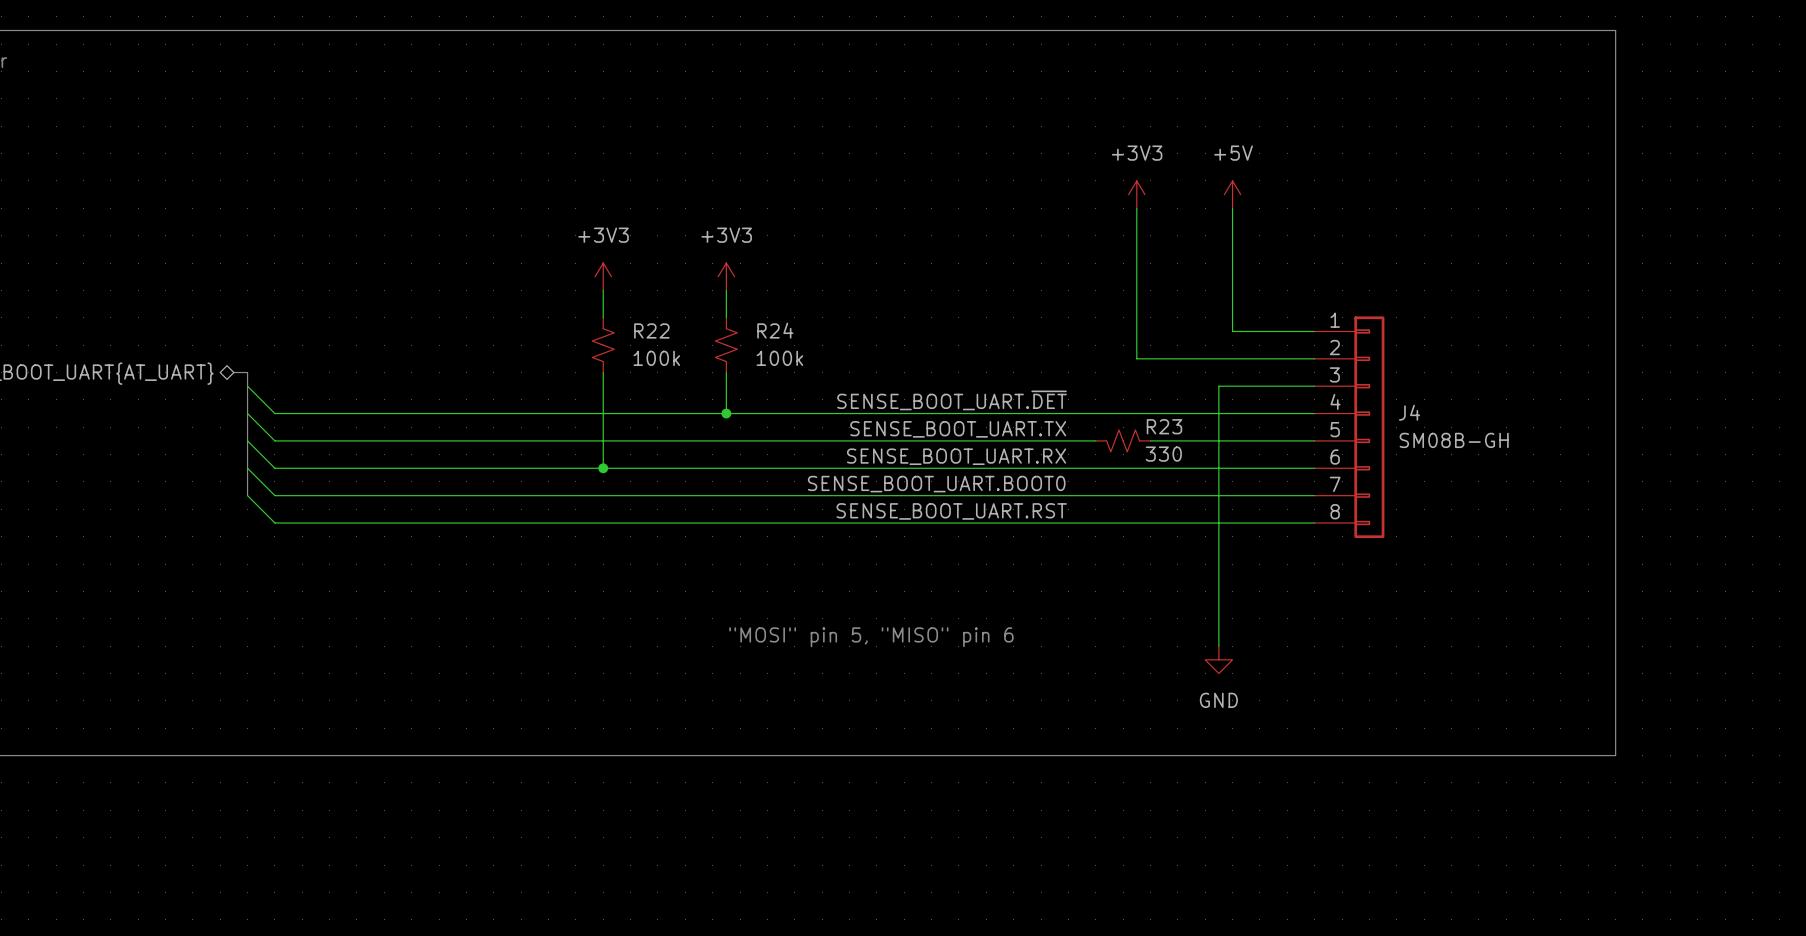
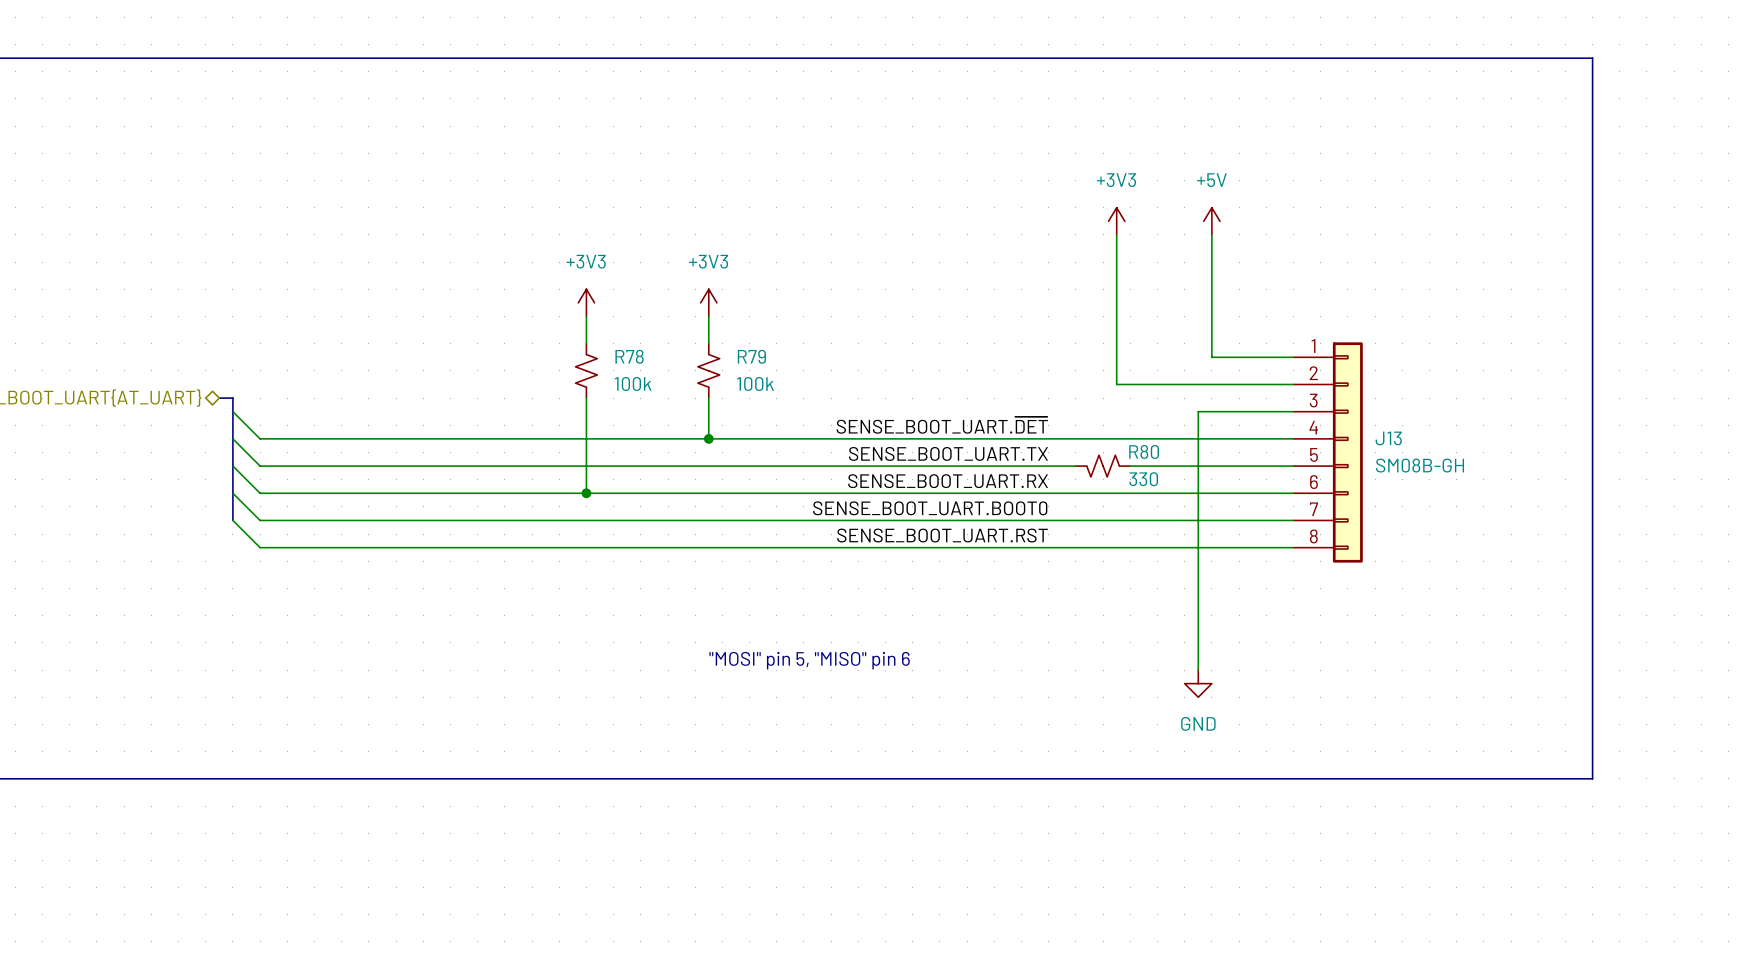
R22 name: R22 (651, 330) -> R78 (629, 356)
R24 name: R24 (775, 330) -> R79 (751, 356)
J4 name: J4 (1409, 412) -> J13 (1388, 438)
R23 name: R23 (1164, 426) -> R80 (1144, 451)

